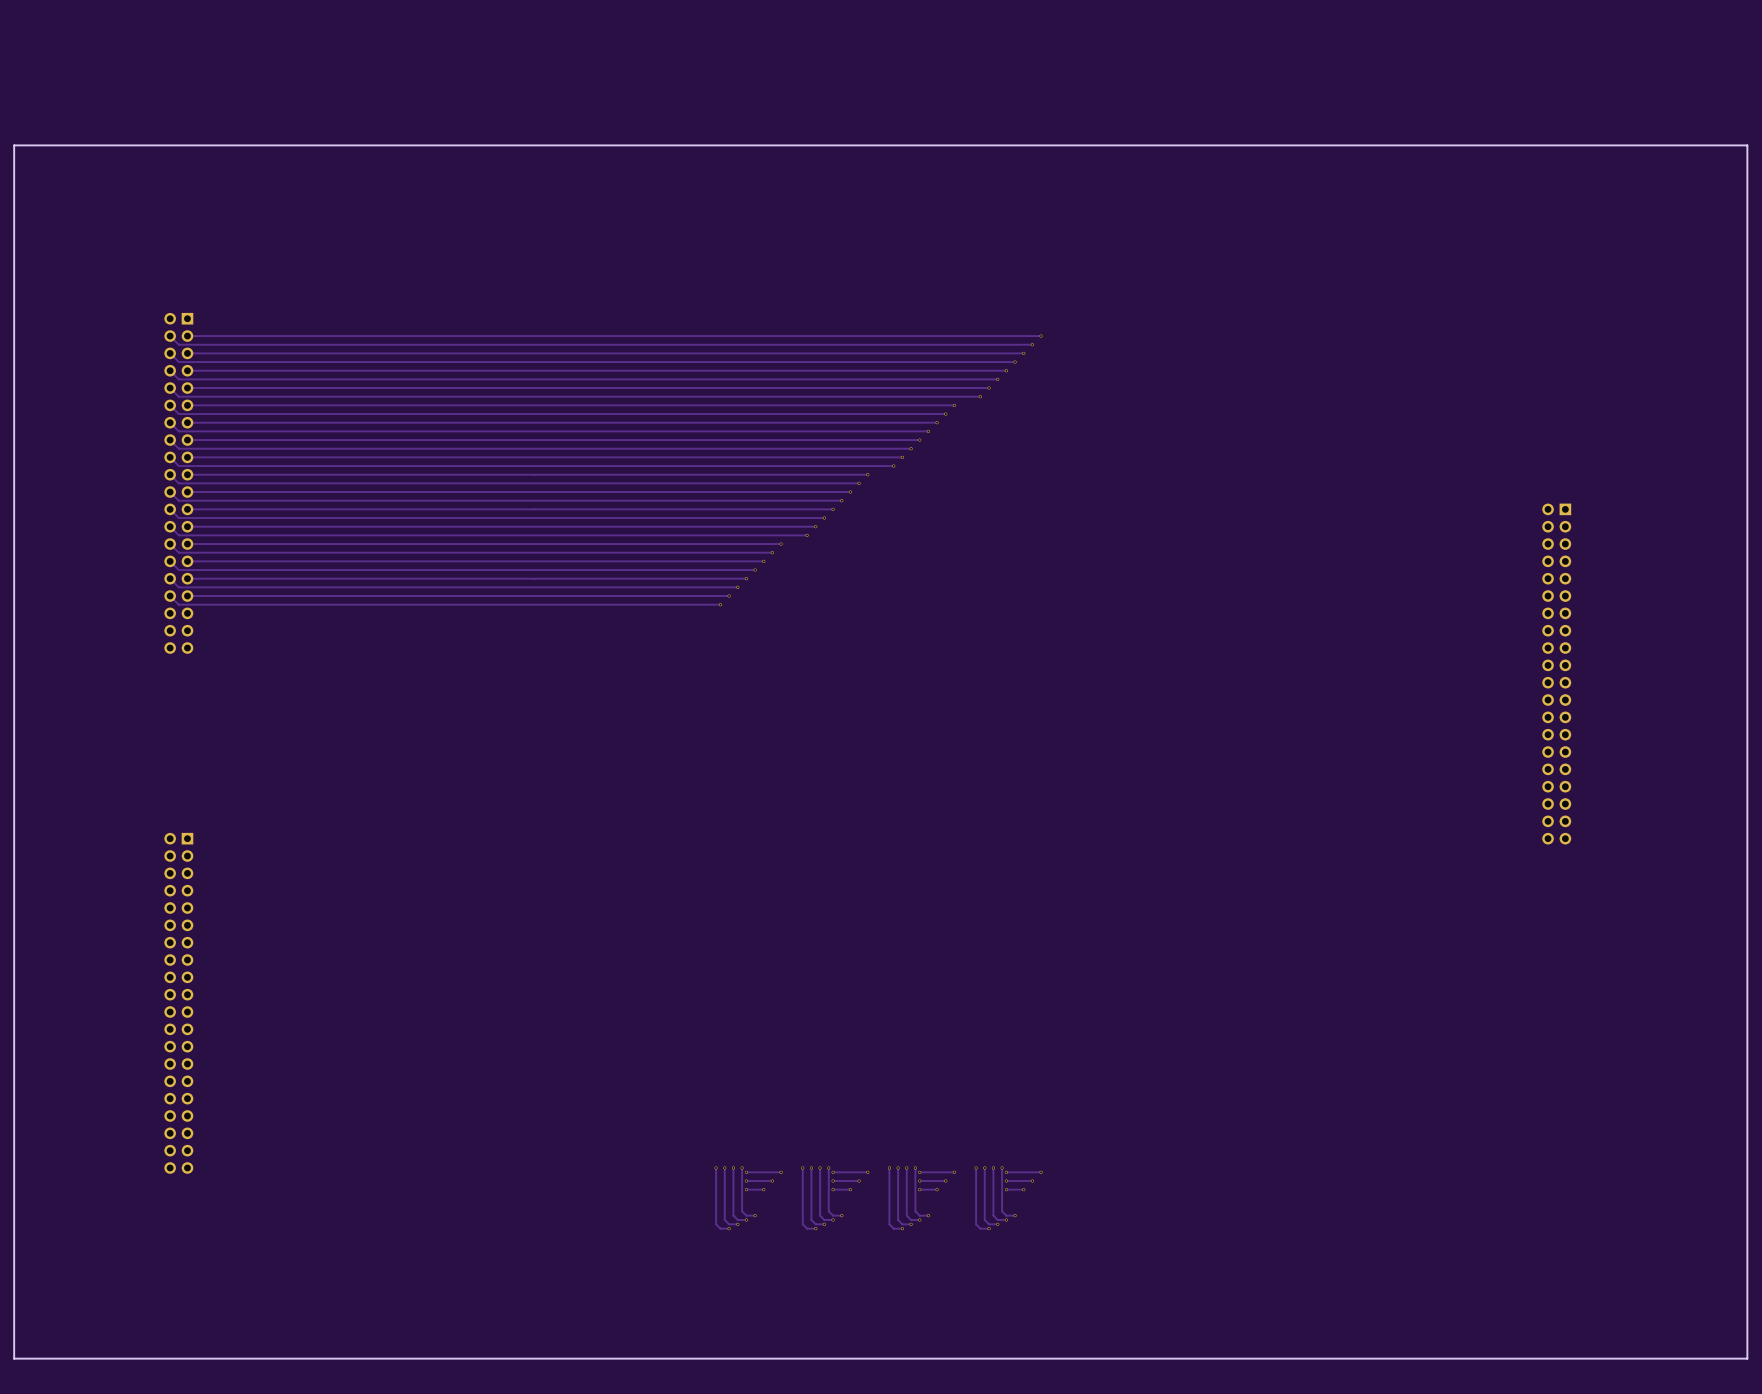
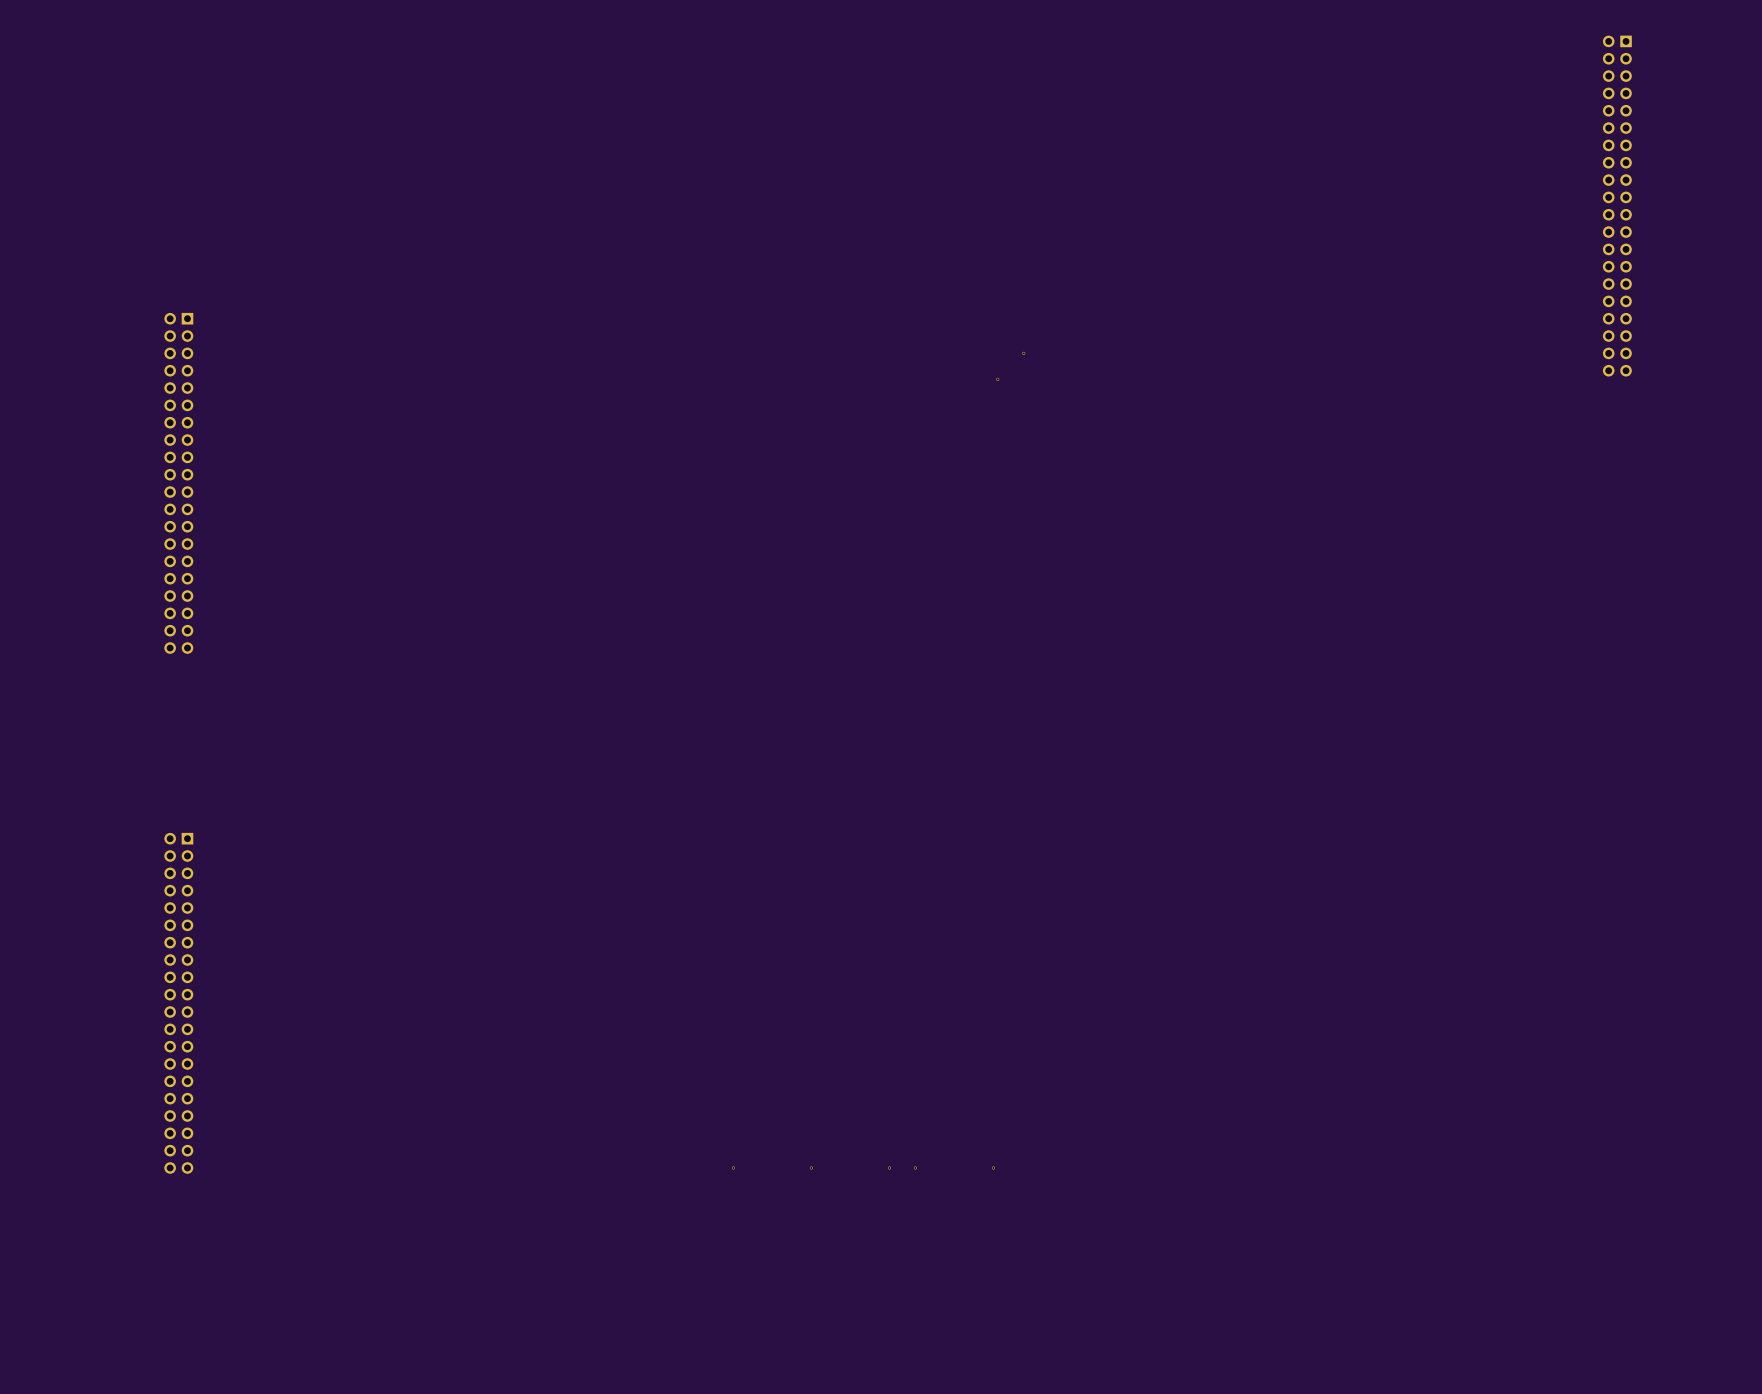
board edge: (1747, 145) (14, 145) (14, 1358) (1747, 1358) (1747, 145) -> none
part: none -> (1617, 206)
track: (170, 336) (178, 344) (1032, 344) -> none
track: (1041, 336) (187, 336) -> none
via: (1041, 336) -> none
via: (1032, 344) -> none
track: (170, 353) (178, 362) (1015, 362) -> none
track: (1023, 353) (187, 353) -> none
via: (1015, 362) -> none
track: (170, 370) (178, 379) (997, 379) -> none
track: (1006, 370) (187, 370) -> none
via: (1006, 370) -> none
track: (170, 388) (178, 396) (980, 396) -> none
track: (989, 388) (187, 388) -> none
via: (989, 388) -> none
via: (980, 396) -> none
track: (170, 405) (178, 414) (945, 414) -> none
track: (954, 405) (187, 405) -> none
via: (954, 405) -> none
via: (945, 414) -> none
track: (170, 422) (178, 431) (928, 431) -> none
track: (937, 422) (187, 422) -> none
via: (937, 422) -> none
via: (928, 431) -> none
track: (170, 440) (178, 448) (911, 448) -> none
track: (919, 440) (187, 440) -> none
via: (919, 440) -> none
via: (911, 448) -> none
track: (170, 457) (178, 466) (893, 466) -> none
track: (902, 457) (187, 457) -> none
via: (902, 457) -> none
via: (893, 466) -> none
track: (170, 474) (178, 483) (859, 483) -> none
track: (867, 474) (187, 474) -> none
via: (867, 474) -> none
via: (859, 483) -> none
track: (170, 492) (178, 500) (841, 500) -> none
track: (850, 492) (187, 492) -> none
via: (850, 492) -> none
via: (841, 500) -> none
track: (170, 509) (178, 518) (824, 518) -> none
track: (833, 509) (187, 509) -> none
via: (833, 509) -> none
via: (824, 518) -> none
track: (170, 526) (178, 535) (807, 535) -> none
track: (815, 526) (187, 526) -> none
via: (815, 526) -> none
via: (807, 535) -> none
track: (170, 544) (178, 552) (772, 552) -> none
track: (781, 544) (187, 544) -> none
via: (781, 544) -> none
via: (772, 552) -> none
track: (170, 561) (178, 570) (755, 570) -> none
track: (763, 561) (187, 561) -> none
via: (763, 561) -> none
via: (755, 570) -> none
track: (170, 578) (178, 587) (737, 587) -> none
track: (746, 578) (187, 578) -> none
via: (746, 578) -> none
via: (737, 587) -> none
track: (170, 596) (178, 604) (720, 604) -> none
track: (729, 596) (187, 596) -> none
via: (729, 596) -> none
via: (720, 604) -> none
part: (1556, 674) -> none
track: (716, 1167) (716, 1224) (720, 1228) (729, 1228) -> none
via: (716, 1167) -> none
track: (724, 1167) (724, 1219) (729, 1224) (737, 1224) -> none
via: (724, 1167) -> none
track: (733, 1167) (733, 1215) (737, 1219) (746, 1219) -> none
track: (742, 1167) (742, 1211) (746, 1215) (755, 1215) -> none
via: (742, 1167) -> none
track: (802, 1167) (802, 1224) (807, 1228) (815, 1228) -> none
via: (802, 1167) -> none
track: (811, 1167) (811, 1219) (815, 1224) (824, 1224) -> none
track: (820, 1167) (820, 1215) (824, 1219) (833, 1219) -> none
via: (820, 1167) -> none
track: (828, 1167) (828, 1211) (833, 1215) (841, 1215) -> none
via: (828, 1167) -> none
track: (889, 1167) (889, 1224) (893, 1228) (902, 1228) -> none
track: (898, 1167) (898, 1219) (902, 1224) (911, 1224) -> none
via: (898, 1167) -> none
track: (906, 1167) (906, 1215) (911, 1219) (919, 1219) -> none
via: (906, 1167) -> none
track: (915, 1167) (915, 1211) (919, 1215) (928, 1215) -> none
track: (976, 1167) (976, 1224) (980, 1228) (989, 1228) -> none
via: (976, 1167) -> none
track: (984, 1167) (984, 1219) (989, 1224) (997, 1224) -> none
via: (984, 1167) -> none
track: (993, 1167) (993, 1215) (997, 1219) (1006, 1219) -> none
track: (1002, 1167) (1002, 1211) (1006, 1215) (1015, 1215) -> none
via: (1002, 1167) -> none
via: (746, 1172) -> none
track: (781, 1172) (746, 1172) -> none
via: (781, 1172) -> none
via: (833, 1172) -> none
track: (867, 1172) (833, 1172) -> none
via: (867, 1172) -> none
via: (919, 1172) -> none
track: (954, 1172) (919, 1172) -> none
via: (954, 1172) -> none
via: (1006, 1172) -> none
track: (1041, 1172) (1006, 1172) -> none
via: (1041, 1172) -> none
via: (746, 1180) -> none
track: (772, 1180) (746, 1180) -> none
via: (772, 1180) -> none
via: (833, 1180) -> none
track: (859, 1180) (833, 1180) -> none
via: (859, 1180) -> none
via: (919, 1180) -> none
track: (945, 1180) (919, 1180) -> none
via: (945, 1180) -> none
via: (1006, 1180) -> none
track: (1032, 1180) (1006, 1180) -> none
via: (1032, 1180) -> none
via: (746, 1189) -> none
track: (763, 1189) (746, 1189) -> none
via: (763, 1189) -> none
via: (833, 1189) -> none
track: (850, 1189) (833, 1189) -> none
via: (850, 1189) -> none
via: (919, 1189) -> none
track: (937, 1189) (919, 1189) -> none
via: (937, 1189) -> none
via: (1006, 1189) -> none
track: (1023, 1189) (1006, 1189) -> none
via: (1023, 1189) -> none
via: (755, 1215) -> none
via: (841, 1215) -> none
via: (928, 1215) -> none
via: (1015, 1215) -> none
via: (746, 1219) -> none
via: (833, 1219) -> none
via: (919, 1219) -> none
via: (1006, 1219) -> none
via: (737, 1224) -> none
via: (824, 1224) -> none
via: (911, 1224) -> none
via: (997, 1224) -> none
via: (729, 1228) -> none
via: (815, 1228) -> none
via: (902, 1228) -> none
via: (989, 1228) -> none

